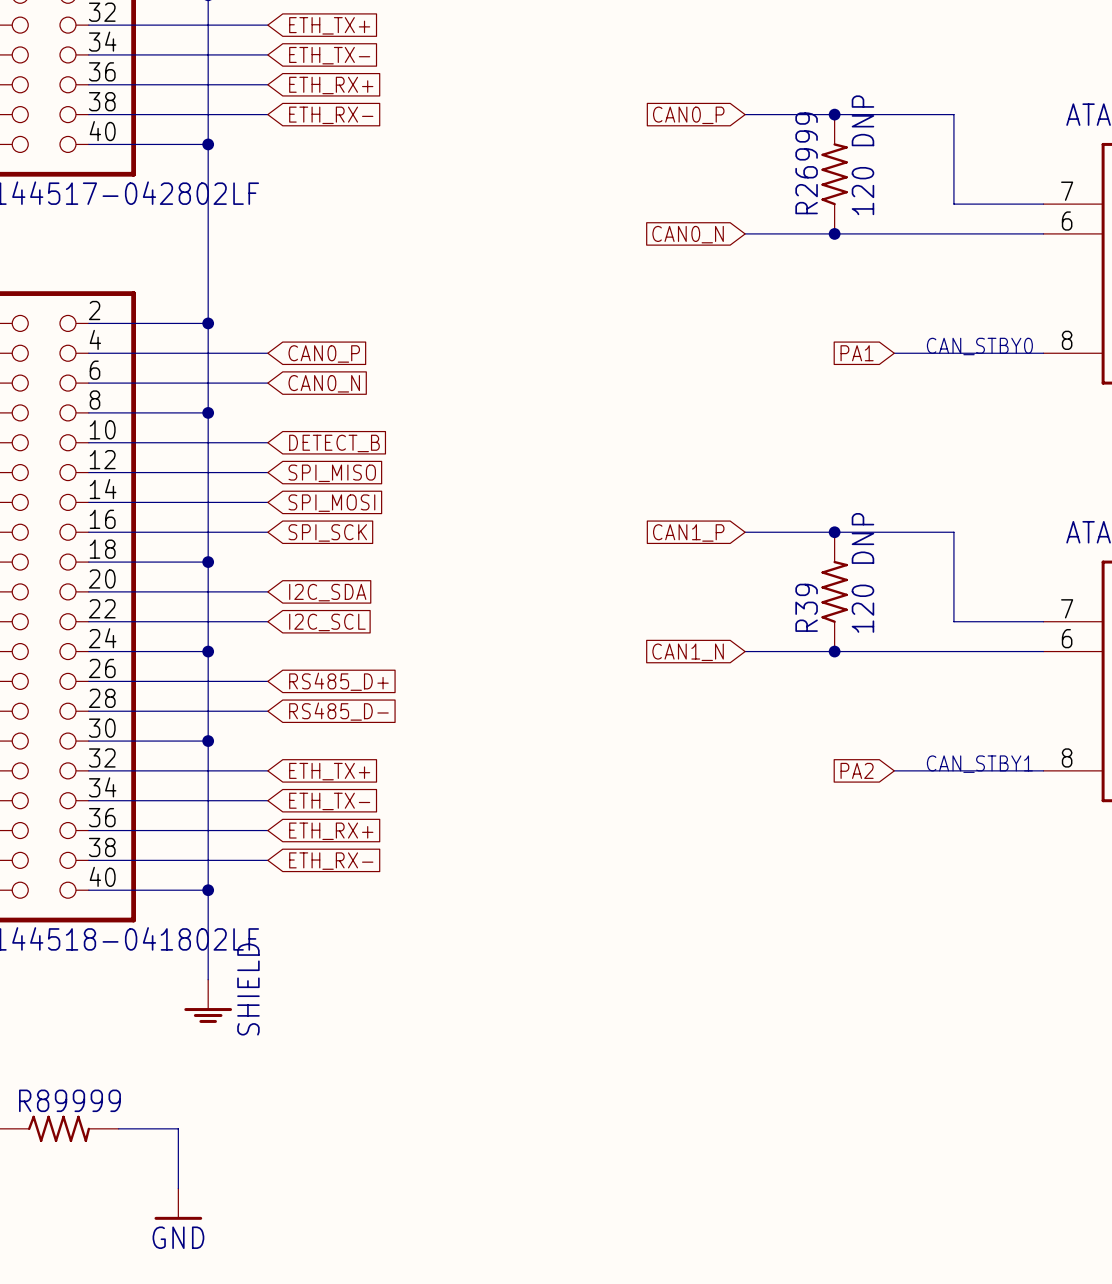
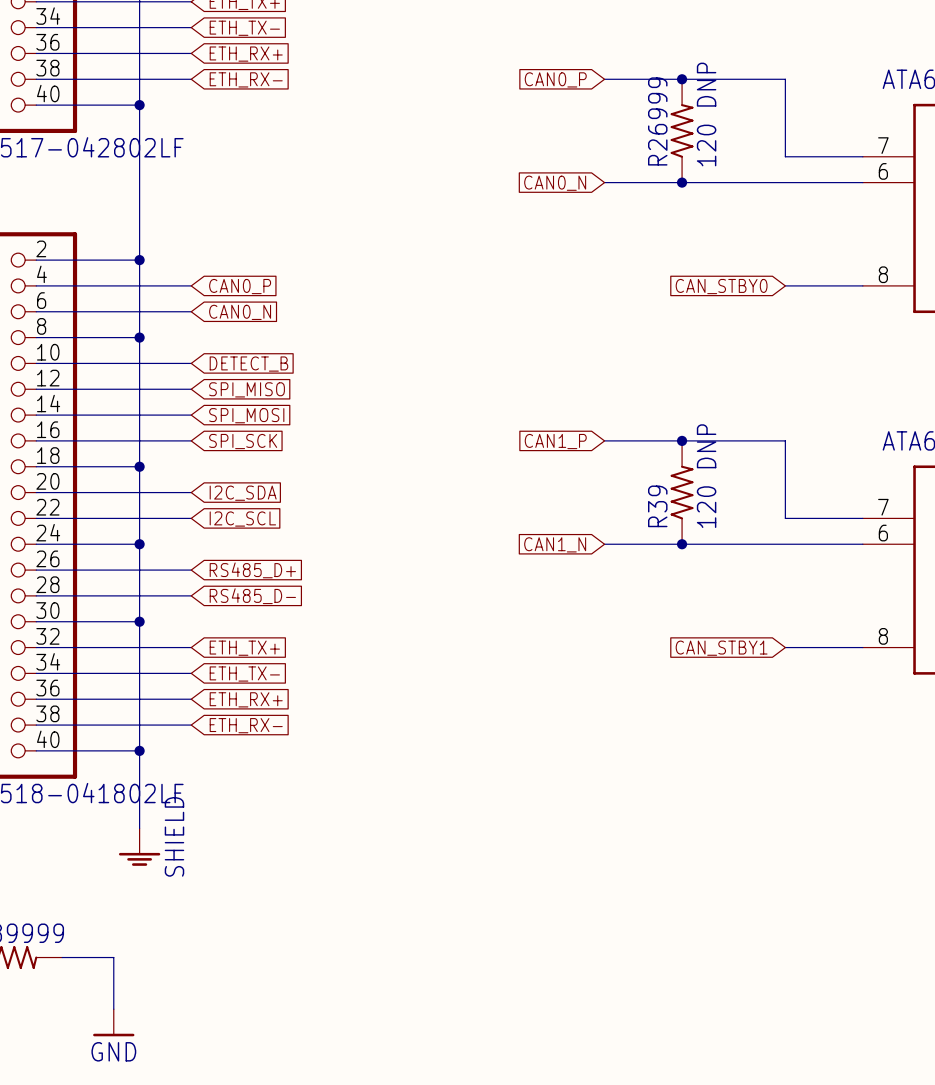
text: CAN_STBY0 (979, 346) -> none
global label: PA1 (857, 353) -> none
global label: none -> CAN_STBY0 (721, 286)
wire: (894, 353) (953, 353) -> none
text: CAN_STBY1 (979, 764) -> none
global label: PA2 (857, 770) -> none
wire: (894, 770) (953, 770) -> none
global label: none -> CAN_STBY1 (721, 648)

